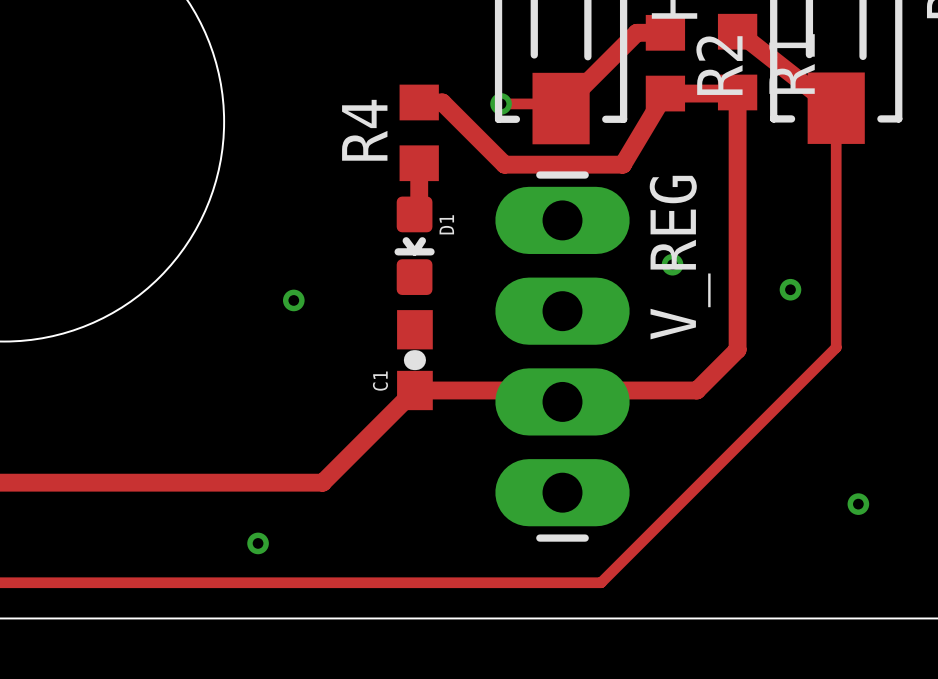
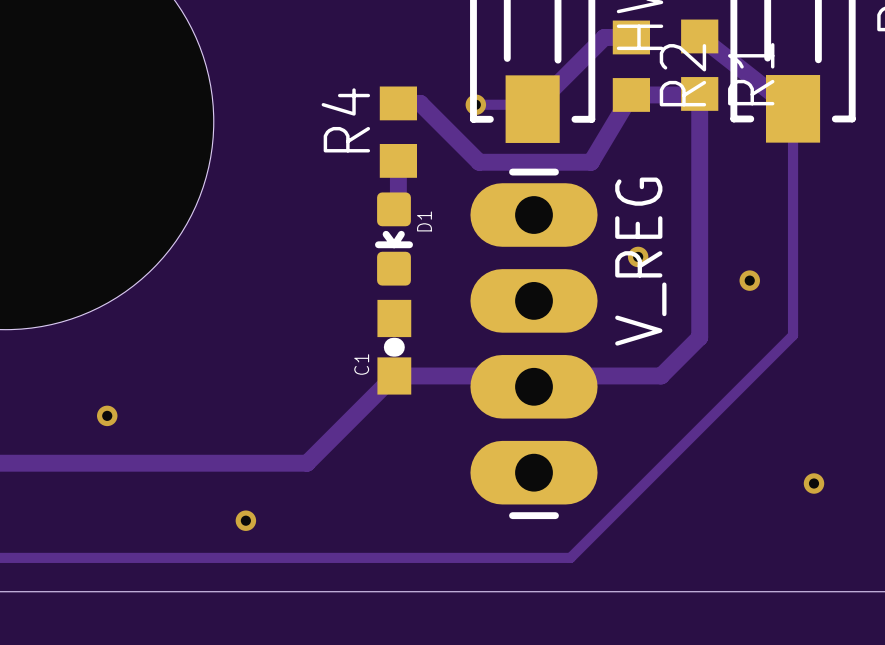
via: (293, 300) -> none
via: none -> (107, 415)

